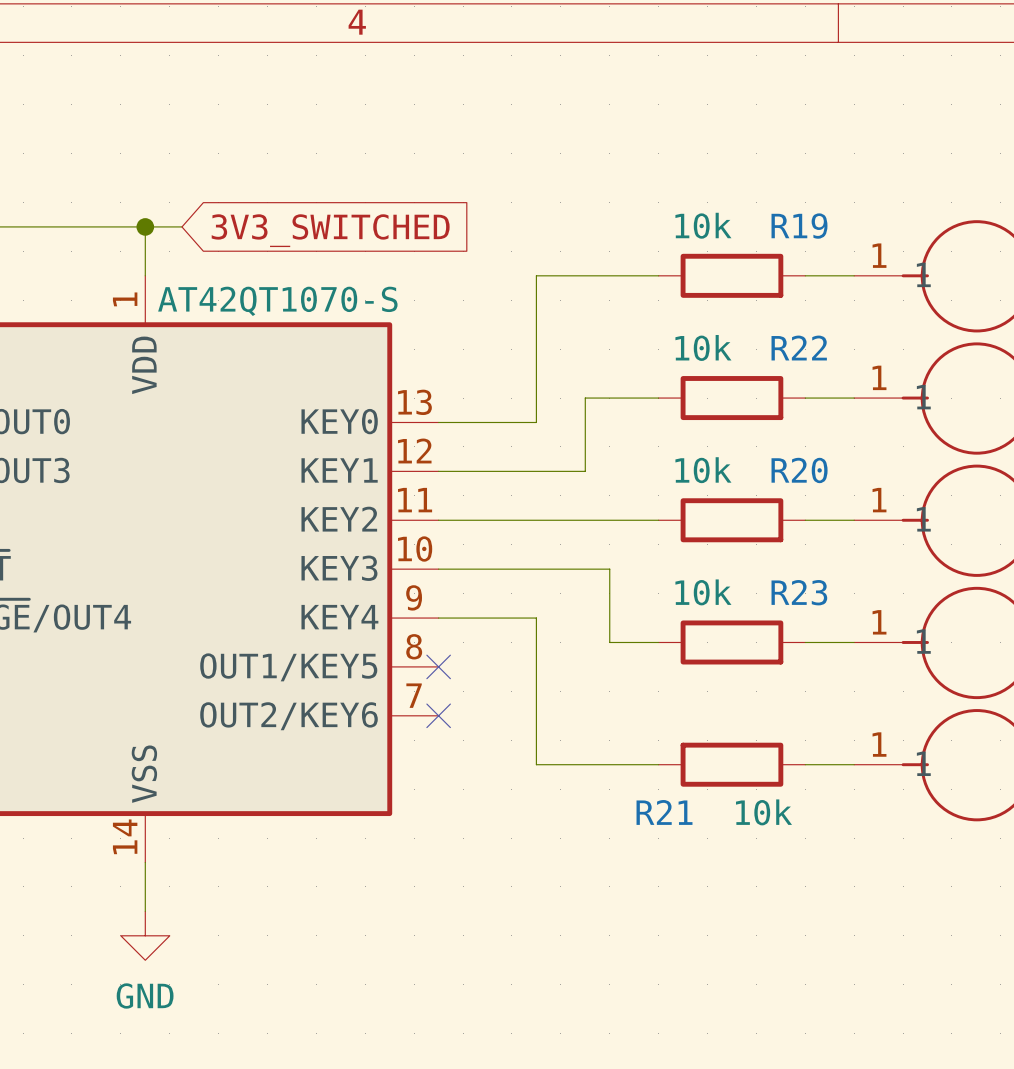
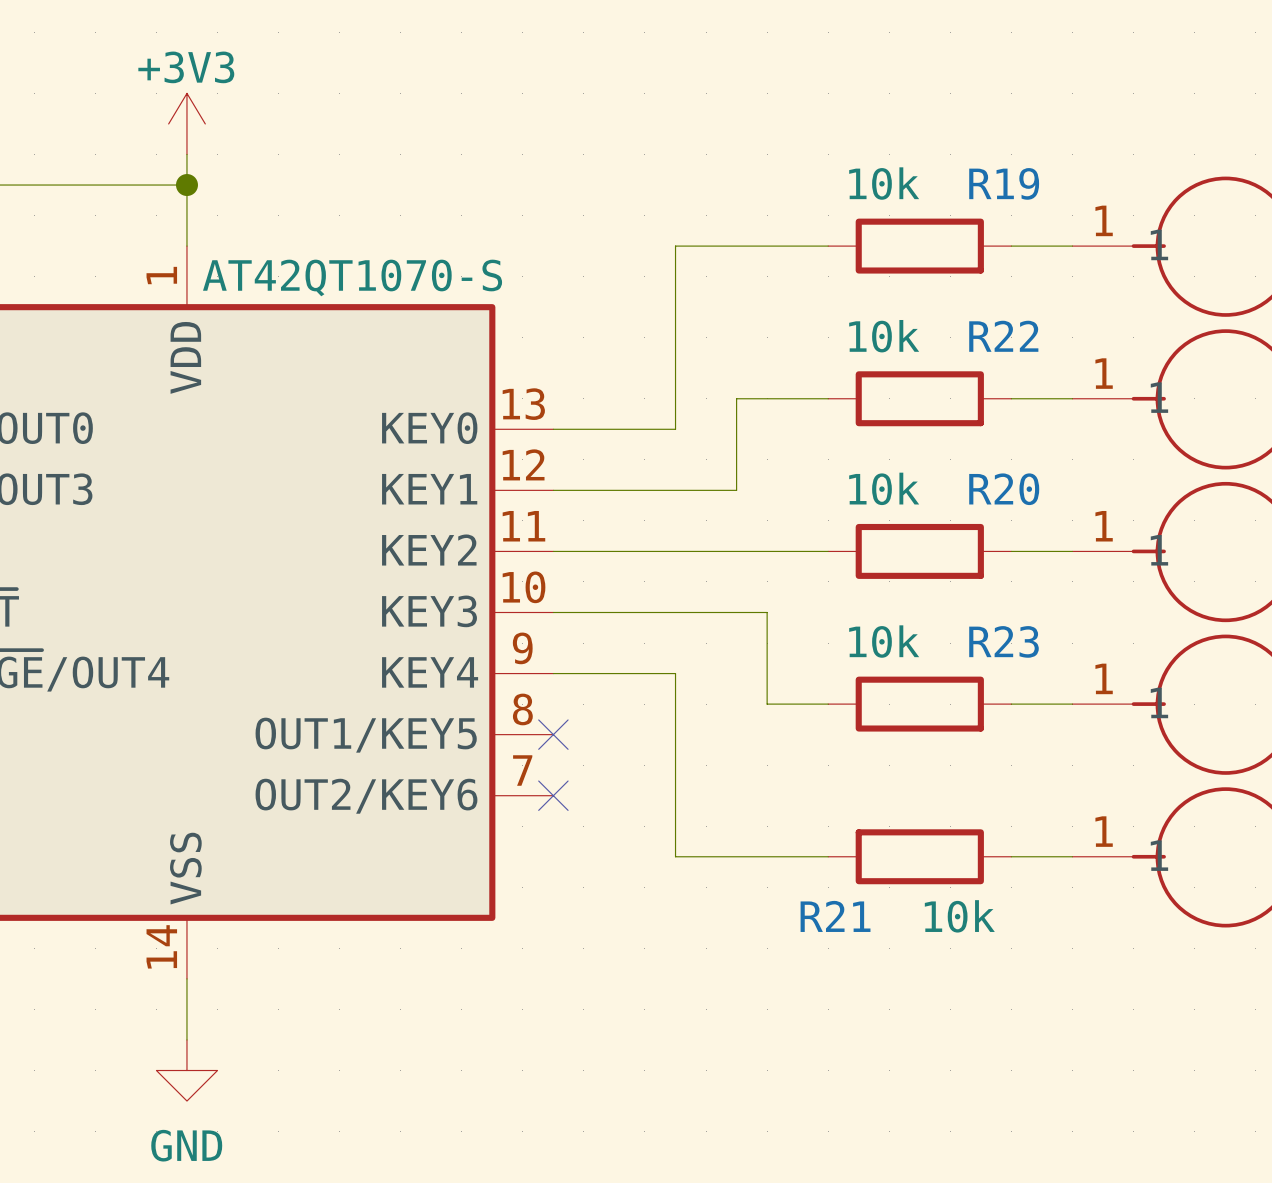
power symbol: none -> +3V3 (186, 123)
wire: (145, 226) (181, 226) -> (186, 185) (186, 154)
global label: 3V3_SWITCHED (330, 230) -> none

